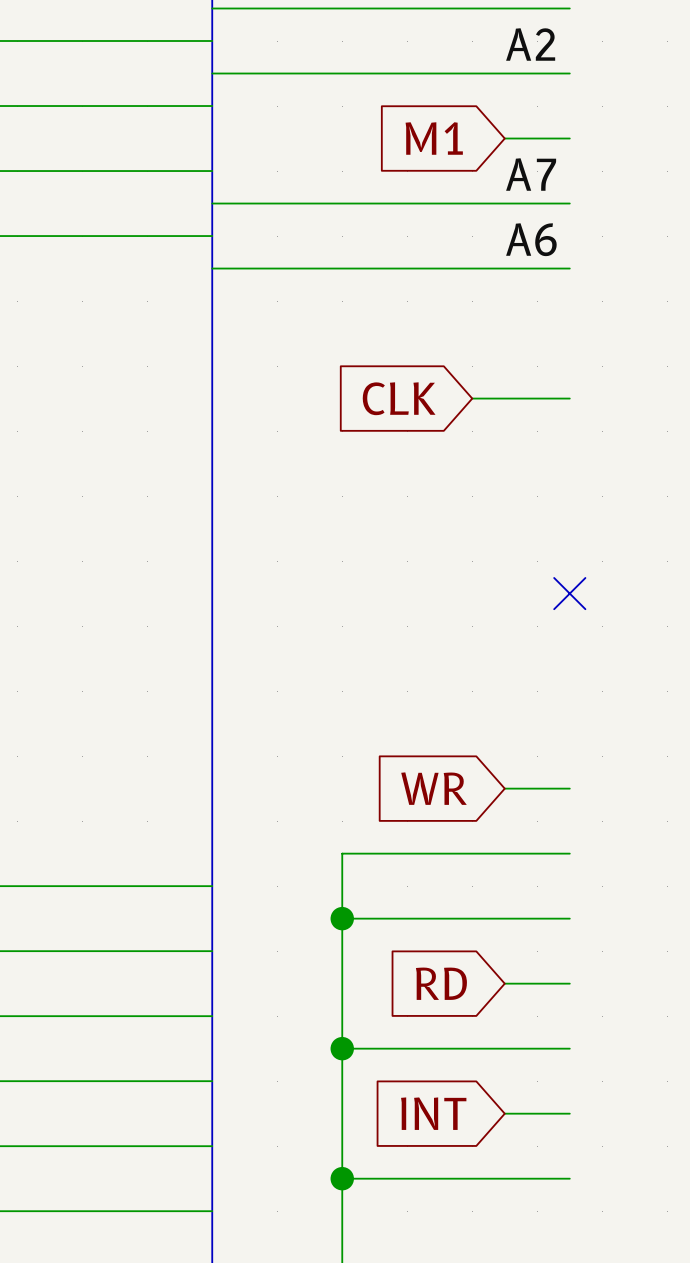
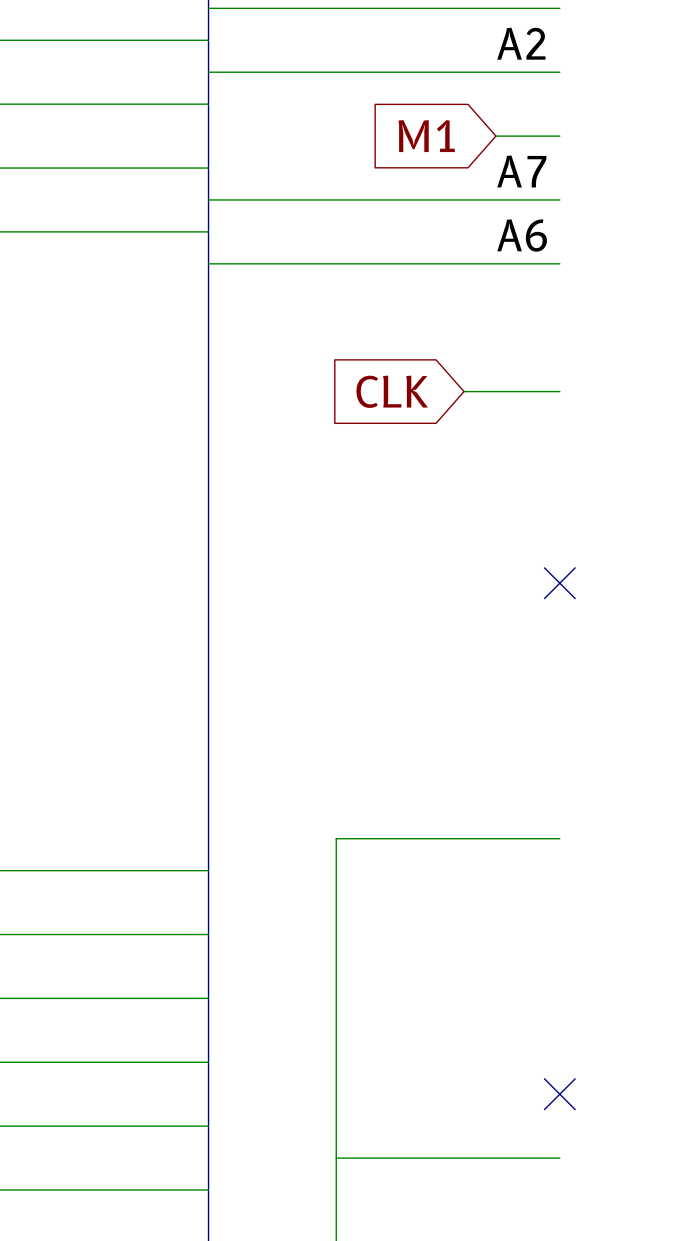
global label: WR (433, 788) -> none
wire: (504, 788) (569, 788) -> none
wire: (342, 918) (569, 918) -> none
junction: (342, 918) -> none
global label: RD (441, 983) -> none
wire: (504, 983) (569, 983) -> none
wire: (342, 1048) (569, 1048) -> none
junction: (342, 1048) -> none
global label: INT (433, 1113) -> none
wire: (504, 1113) (569, 1113) -> none
no-connect mark: none -> (559, 1094)
junction: (342, 1178) -> none

